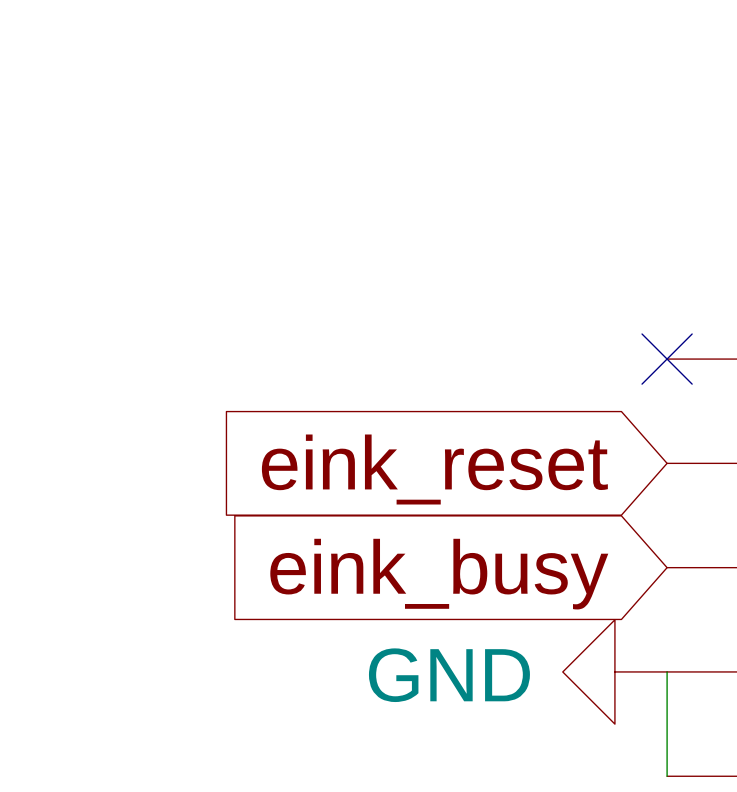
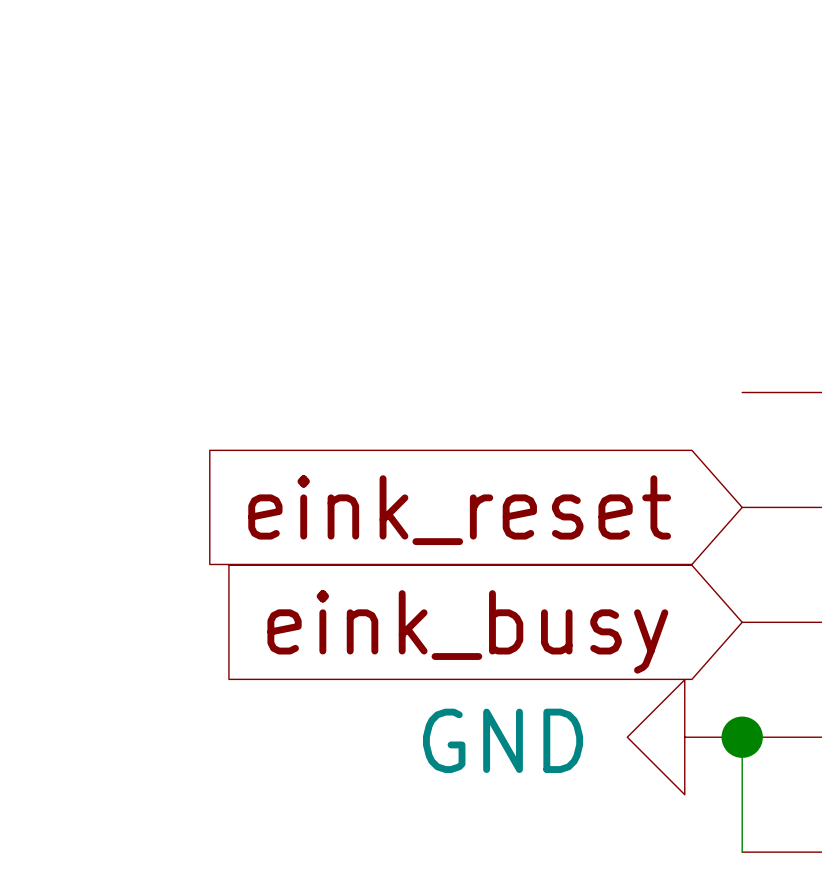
no-connect mark: (667, 359) -> none
junction: none -> (742, 737)

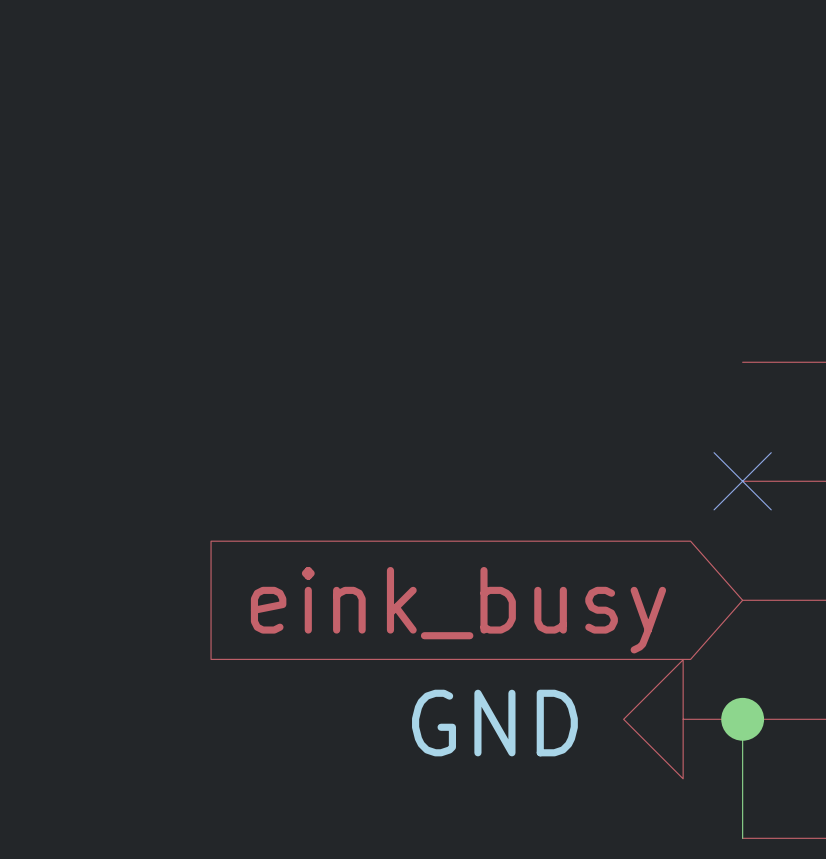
no-connect mark: none -> (742, 481)
global label: eink_reset (459, 510) -> none

